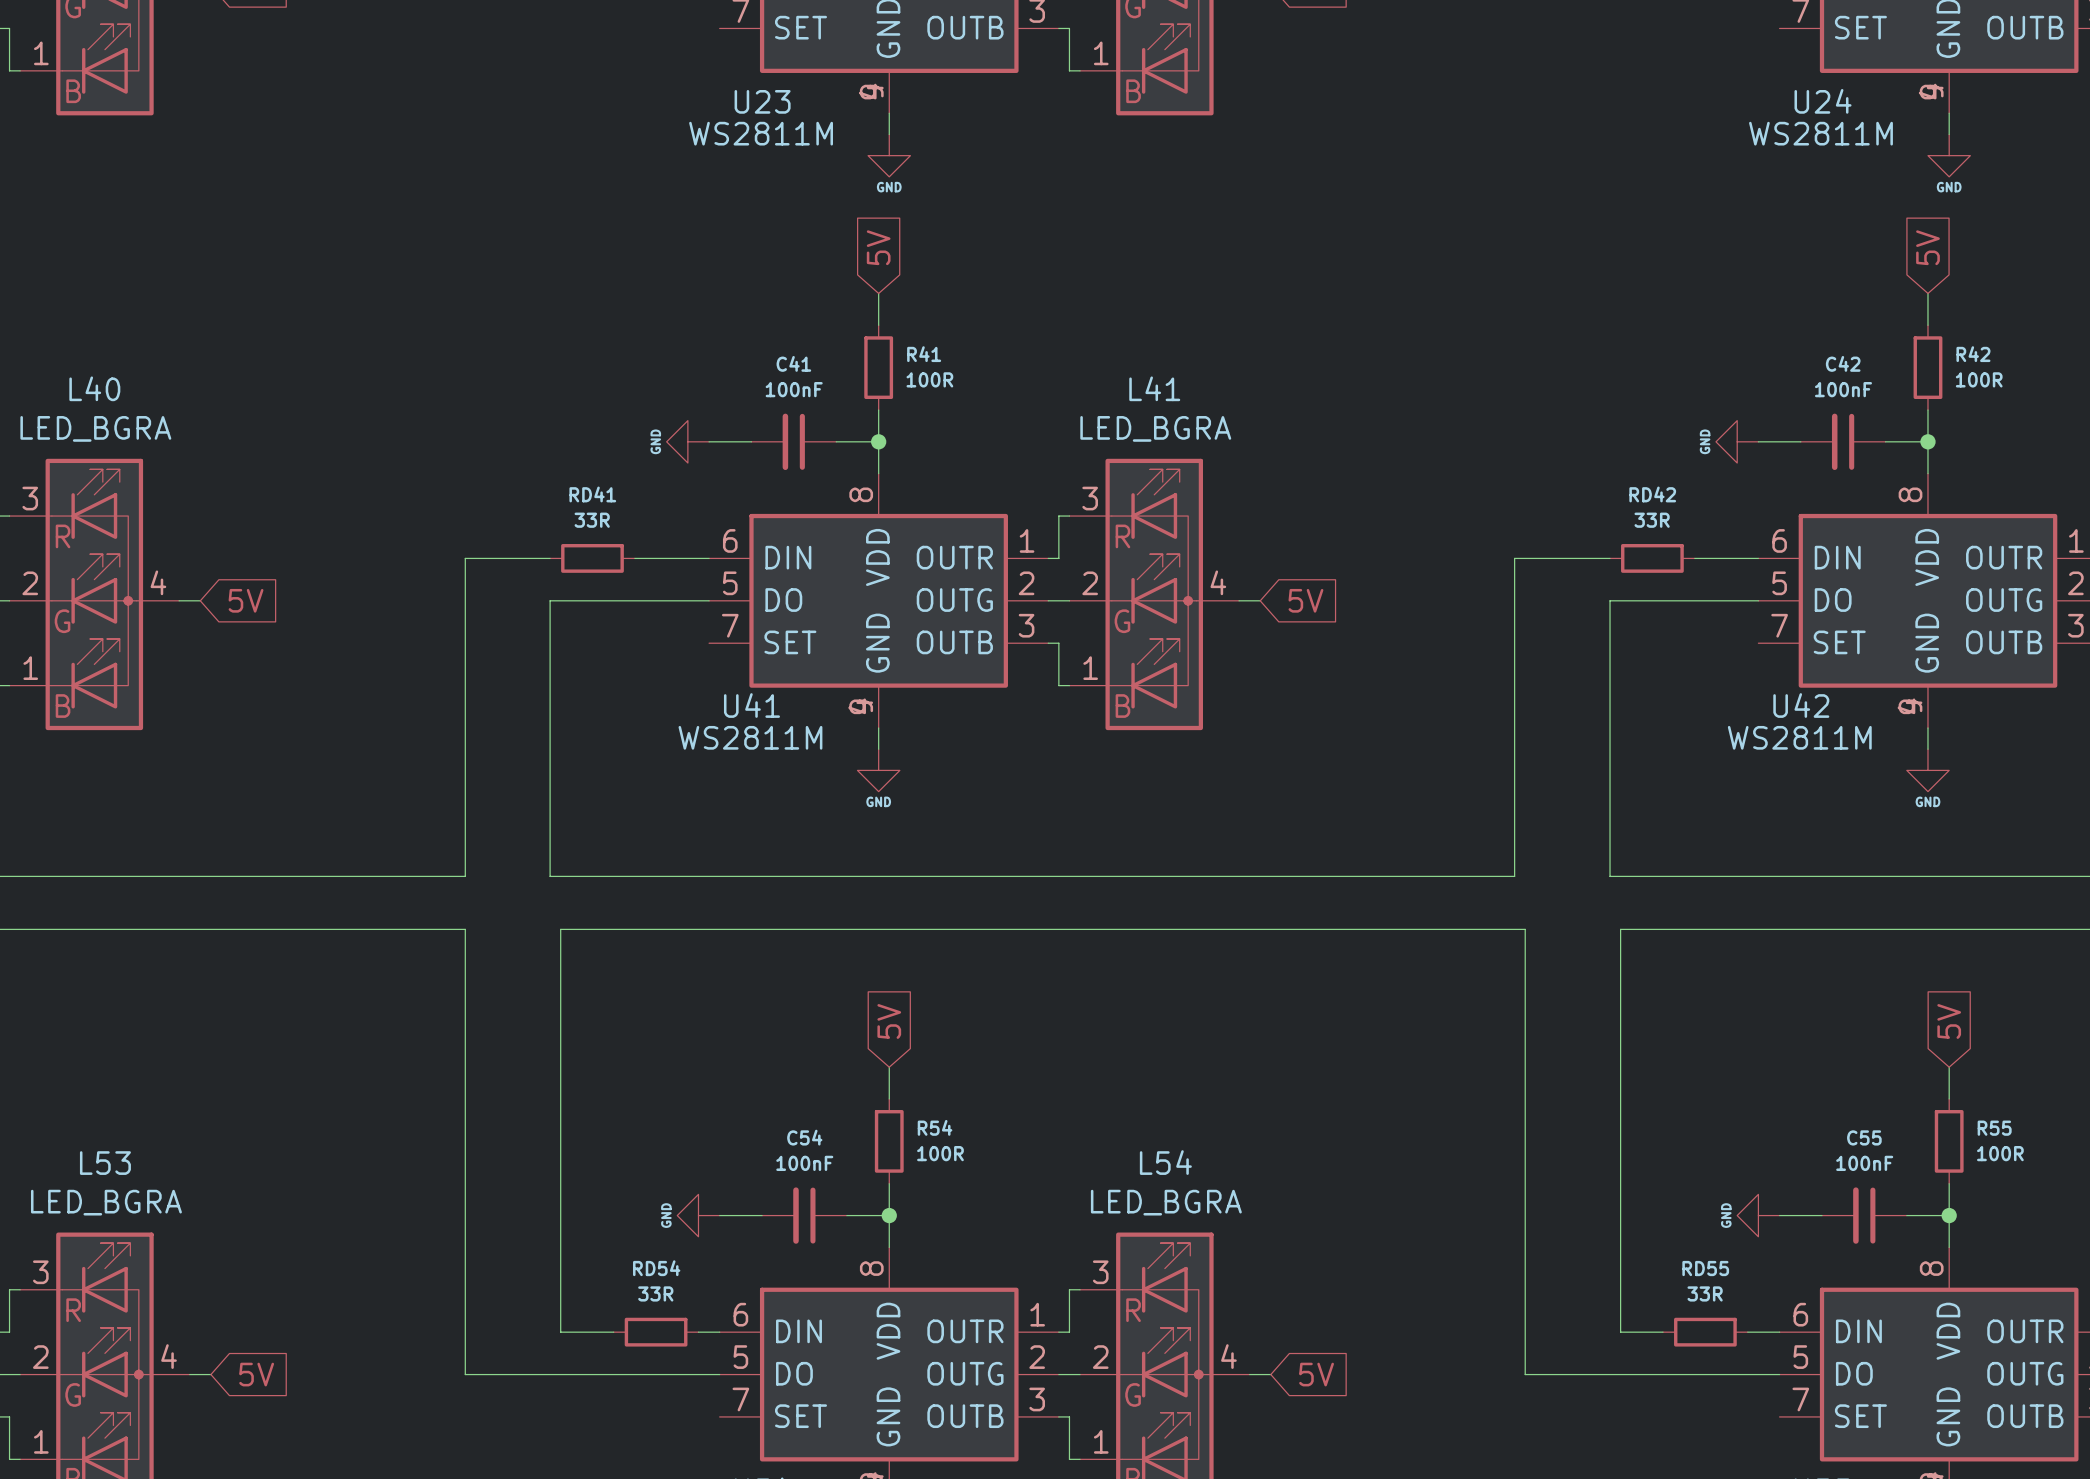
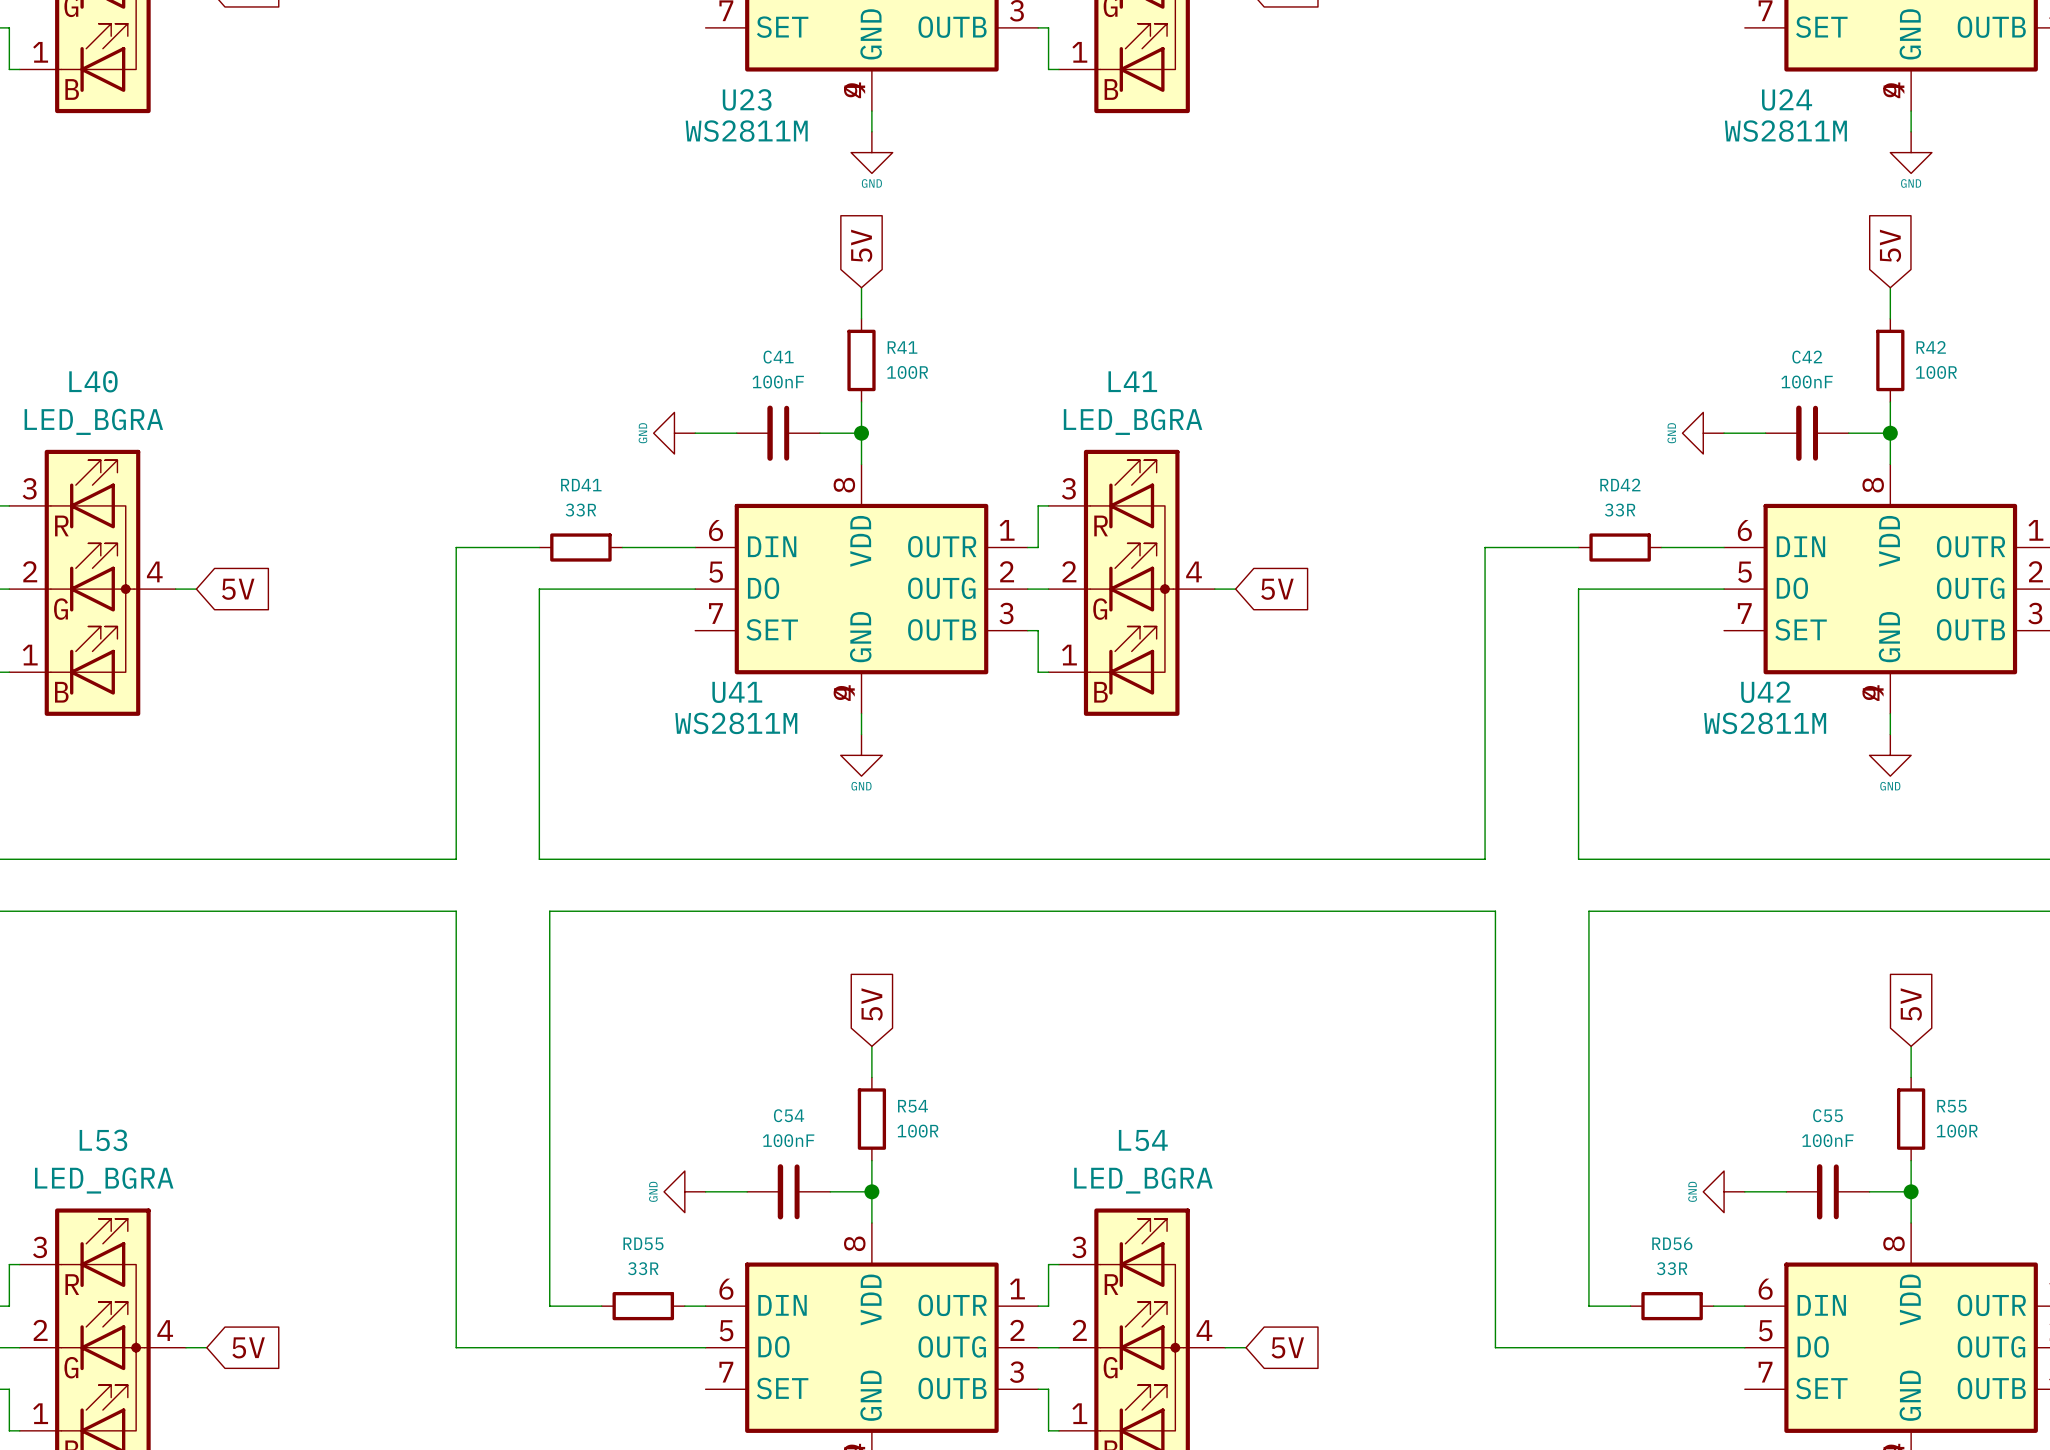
RD54 name: RD54 (656, 1268) -> RD55 (643, 1243)
RD55 name: RD55 (1705, 1268) -> RD56 (1672, 1243)

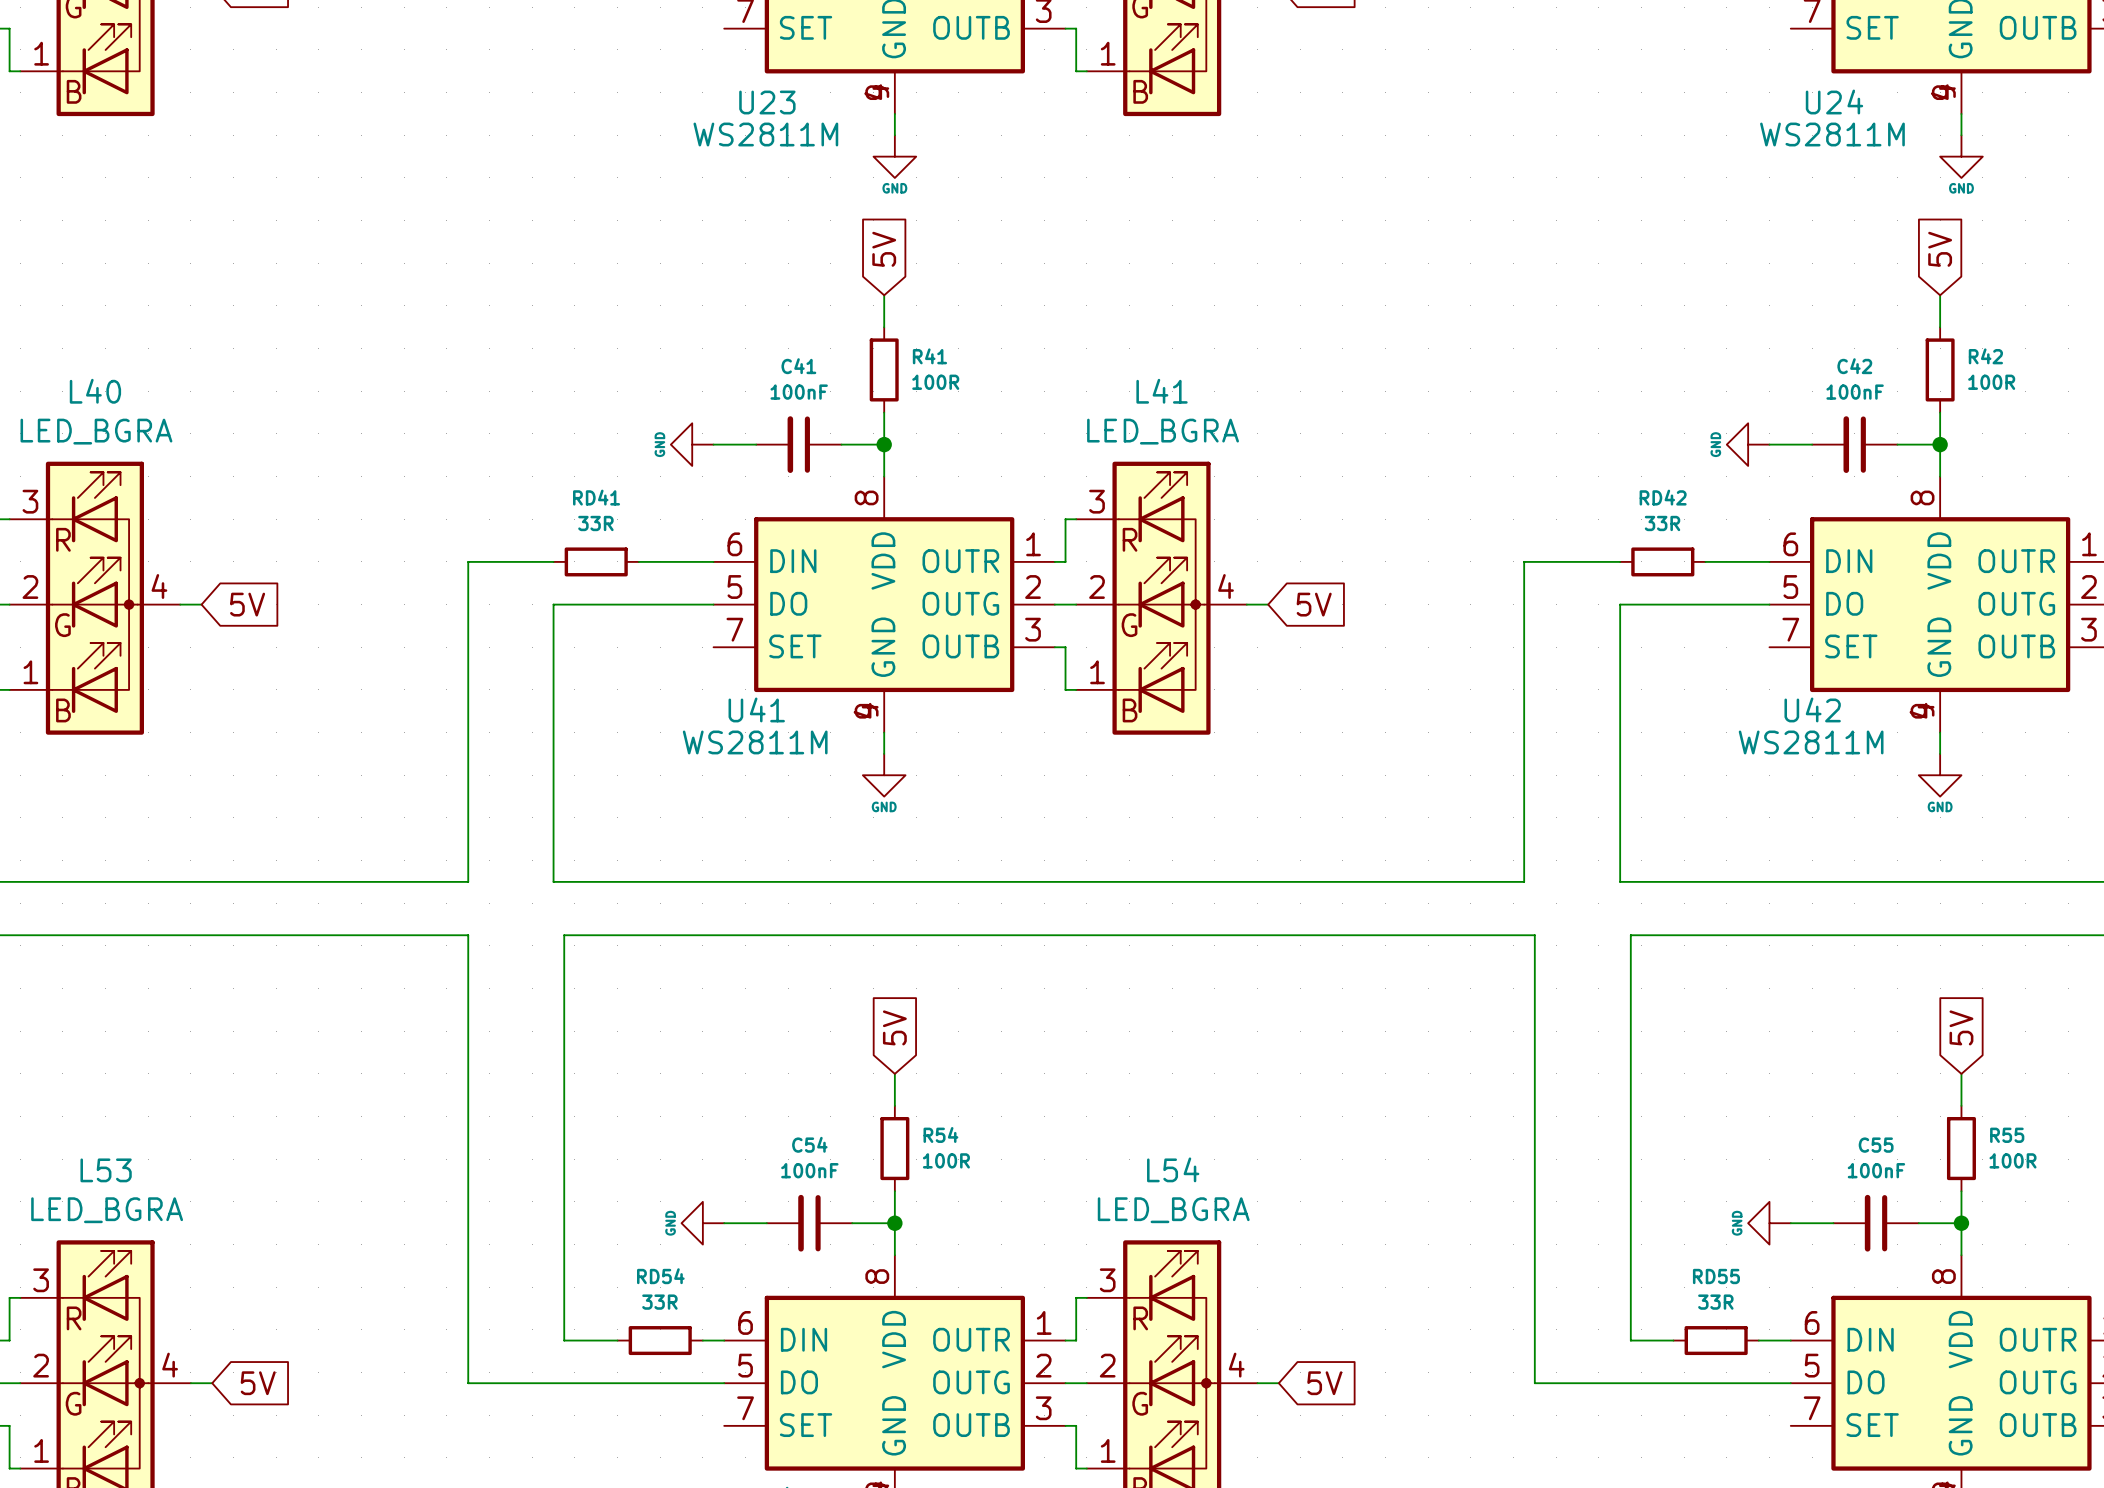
RD55 name: RD55 (643, 1243) -> RD54 (660, 1276)
RD56 name: RD56 (1672, 1243) -> RD55 (1716, 1276)

